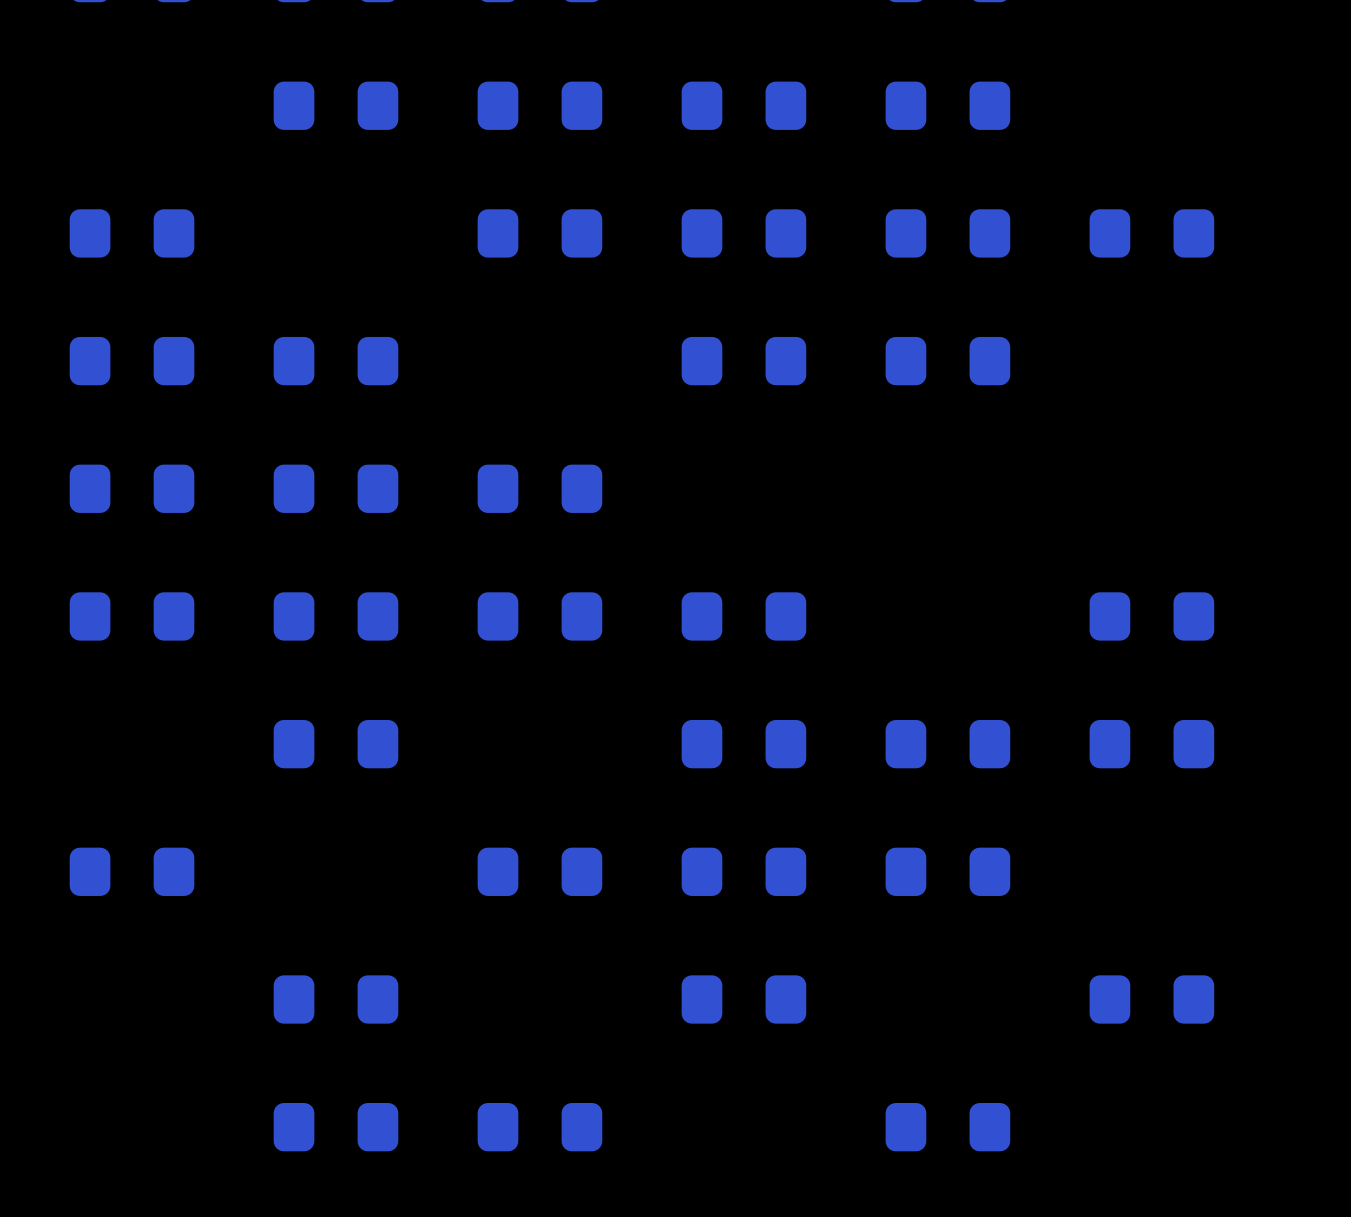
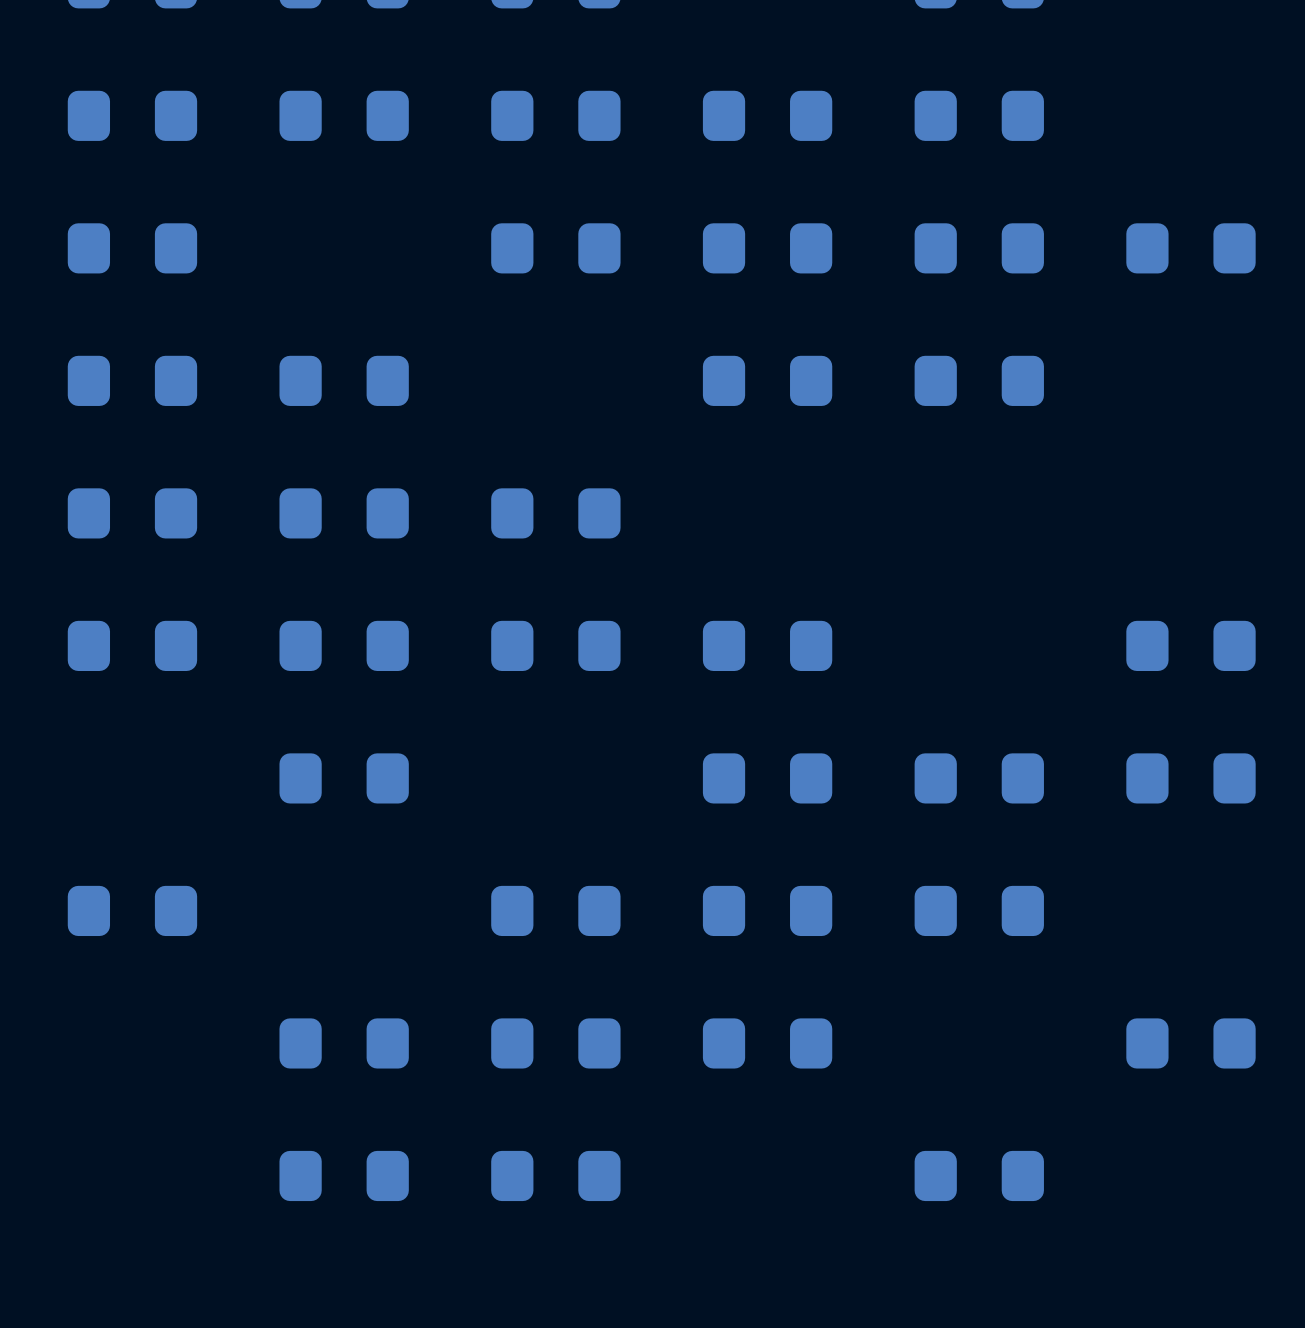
part: none -> (132, 115)
part: none -> (555, 1043)

